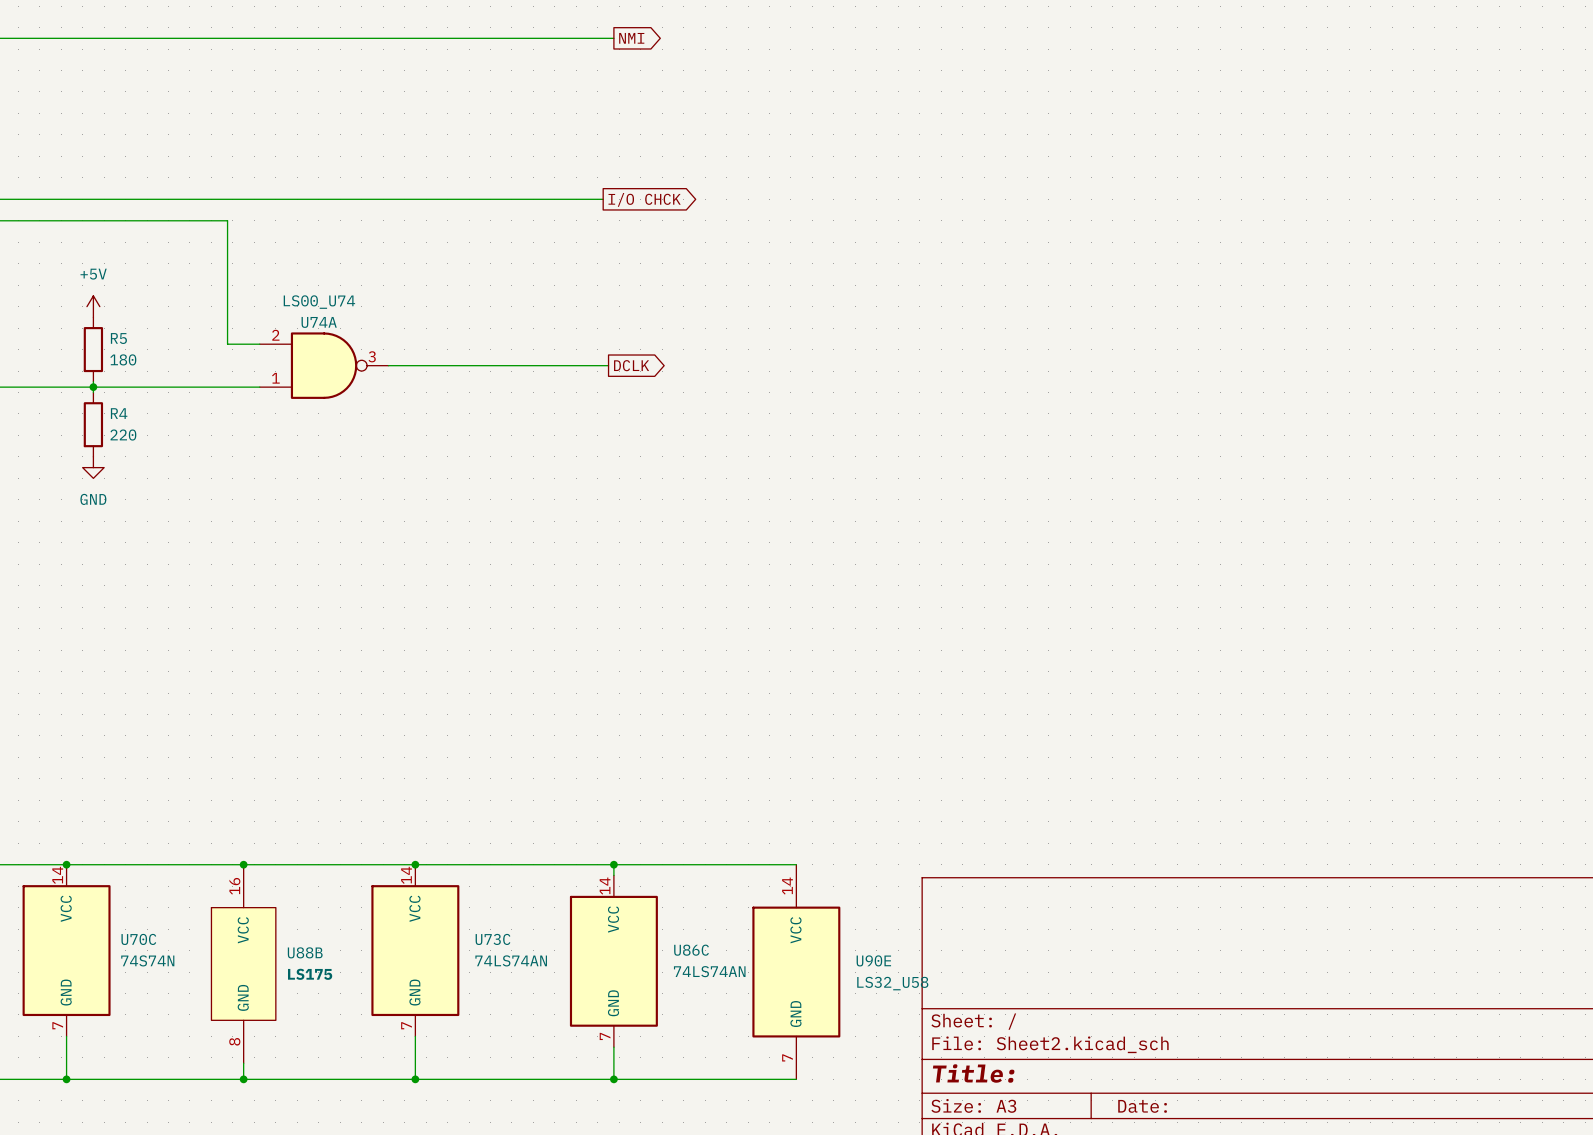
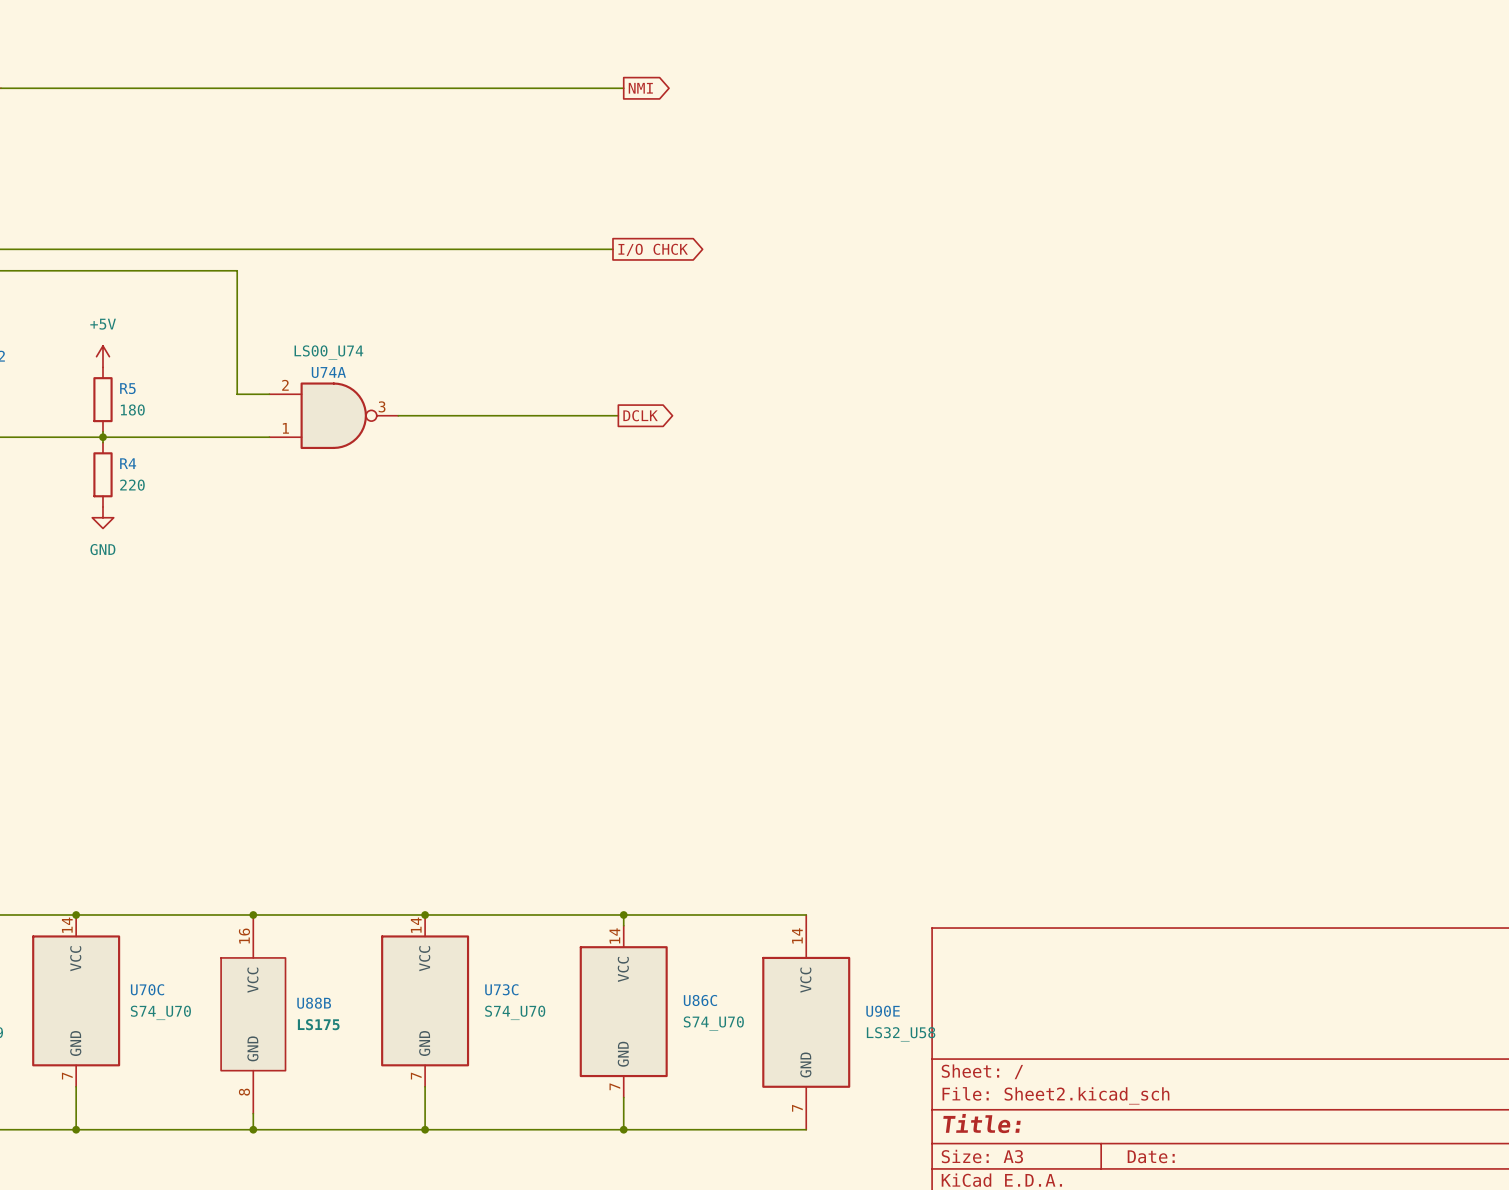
U70C value: 74S74N (147, 960) -> S74_U70 (160, 1012)
U73C value: 74LS74AN (511, 960) -> S74_U70 (515, 1012)
U86C value: 74LS74AN (709, 971) -> S74_U70 (713, 1023)

